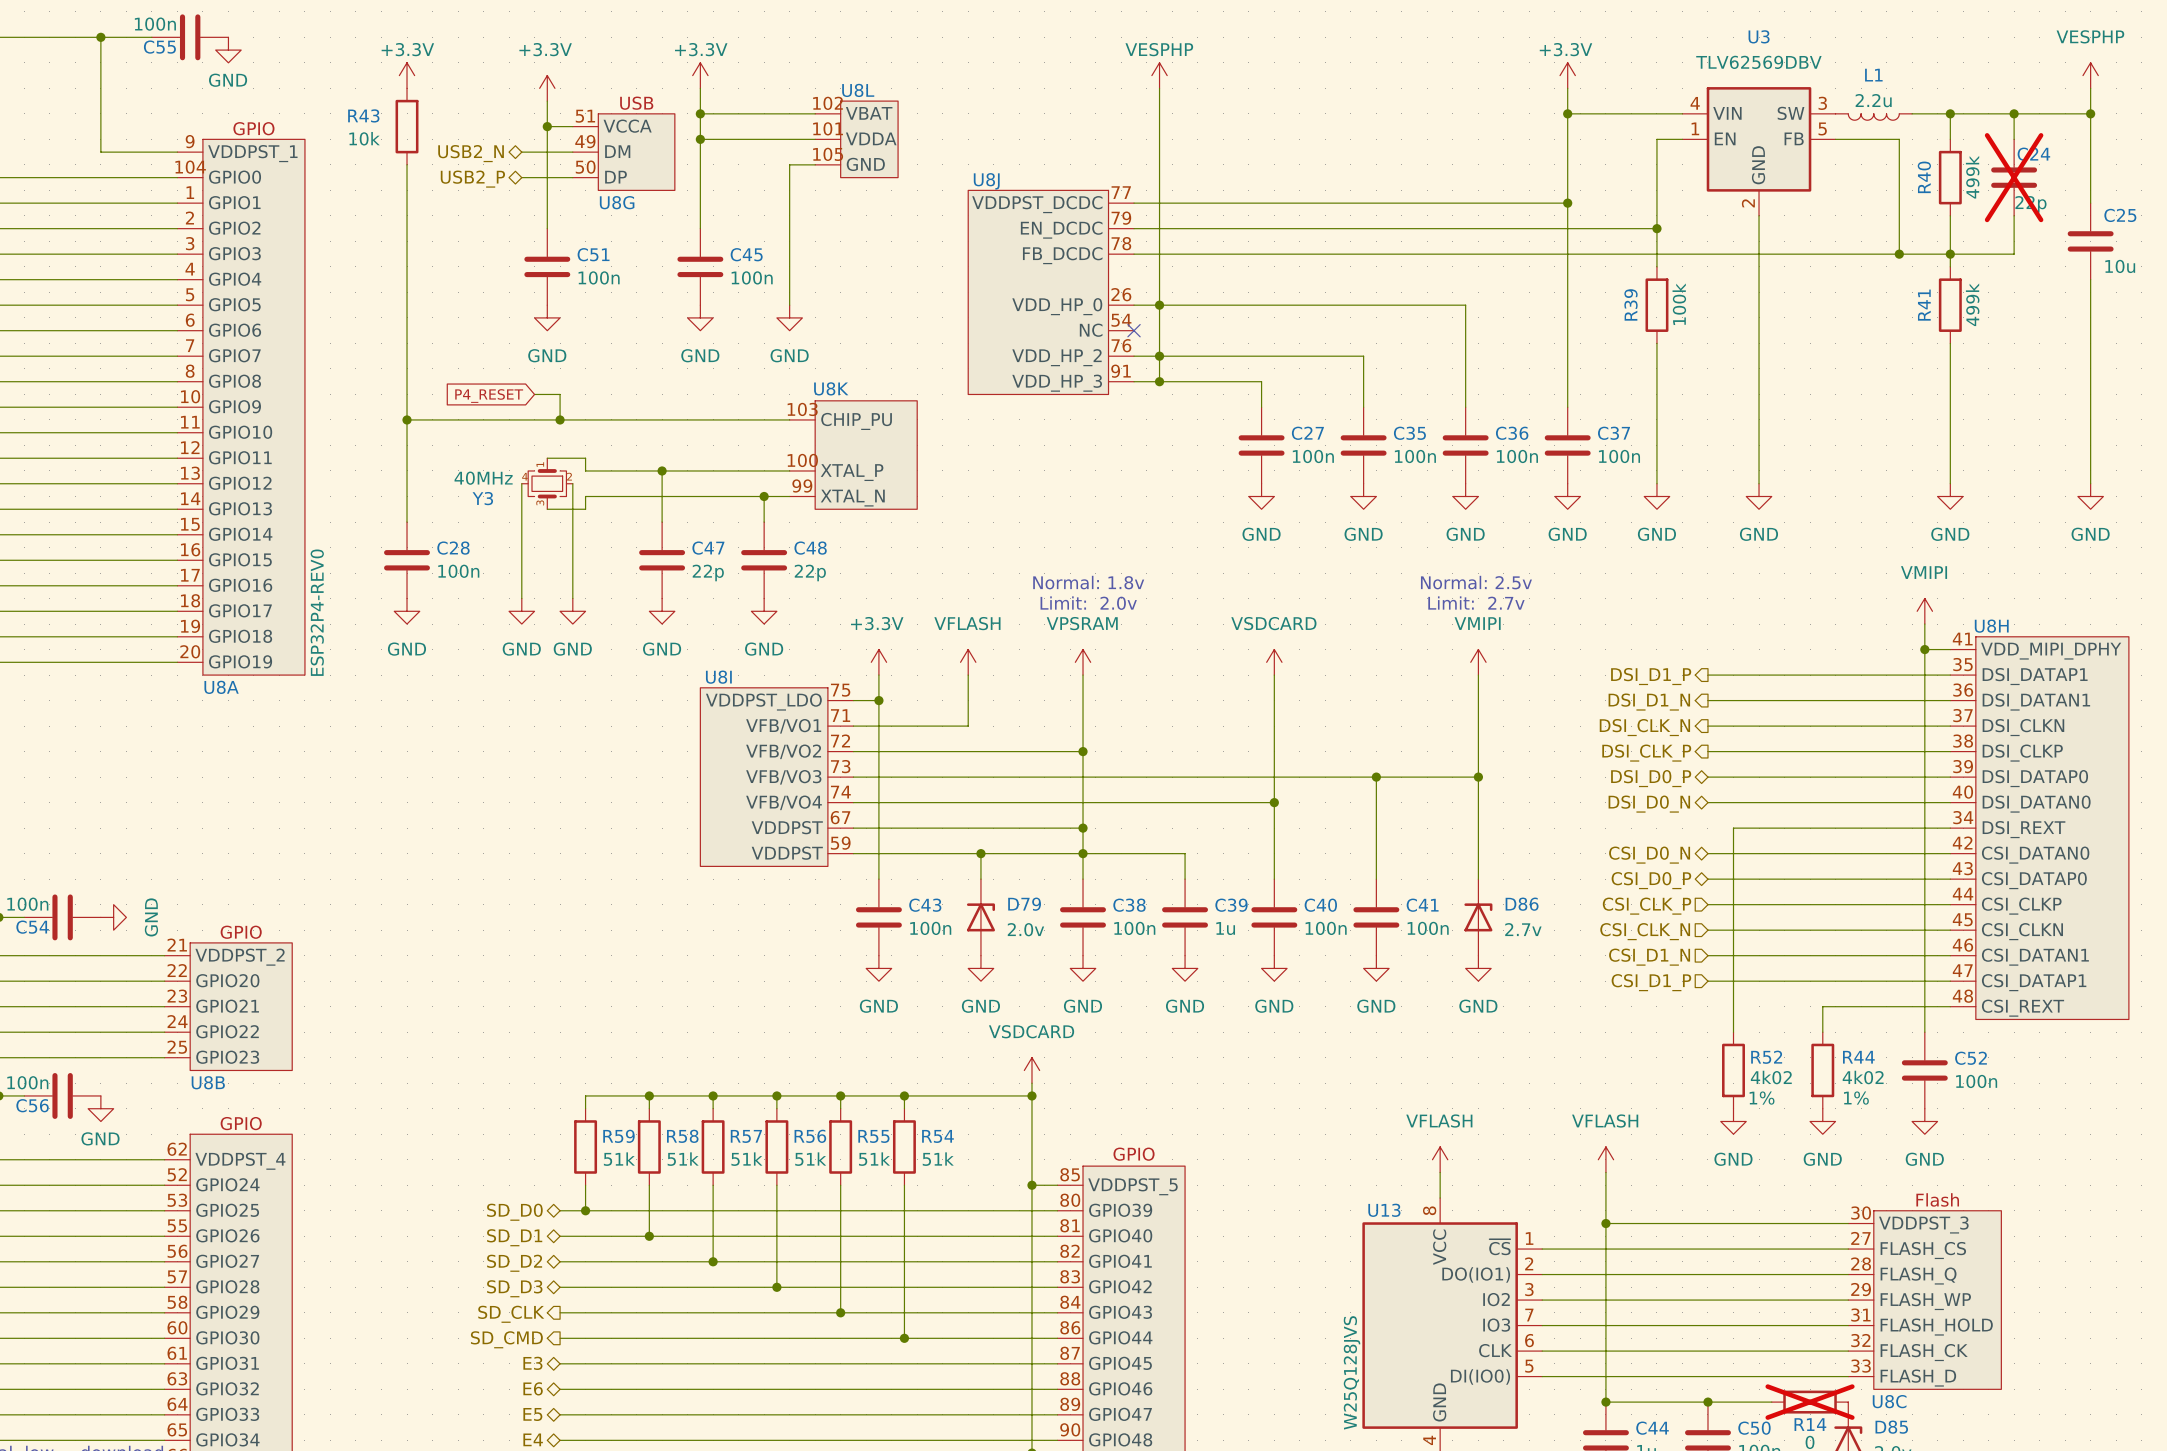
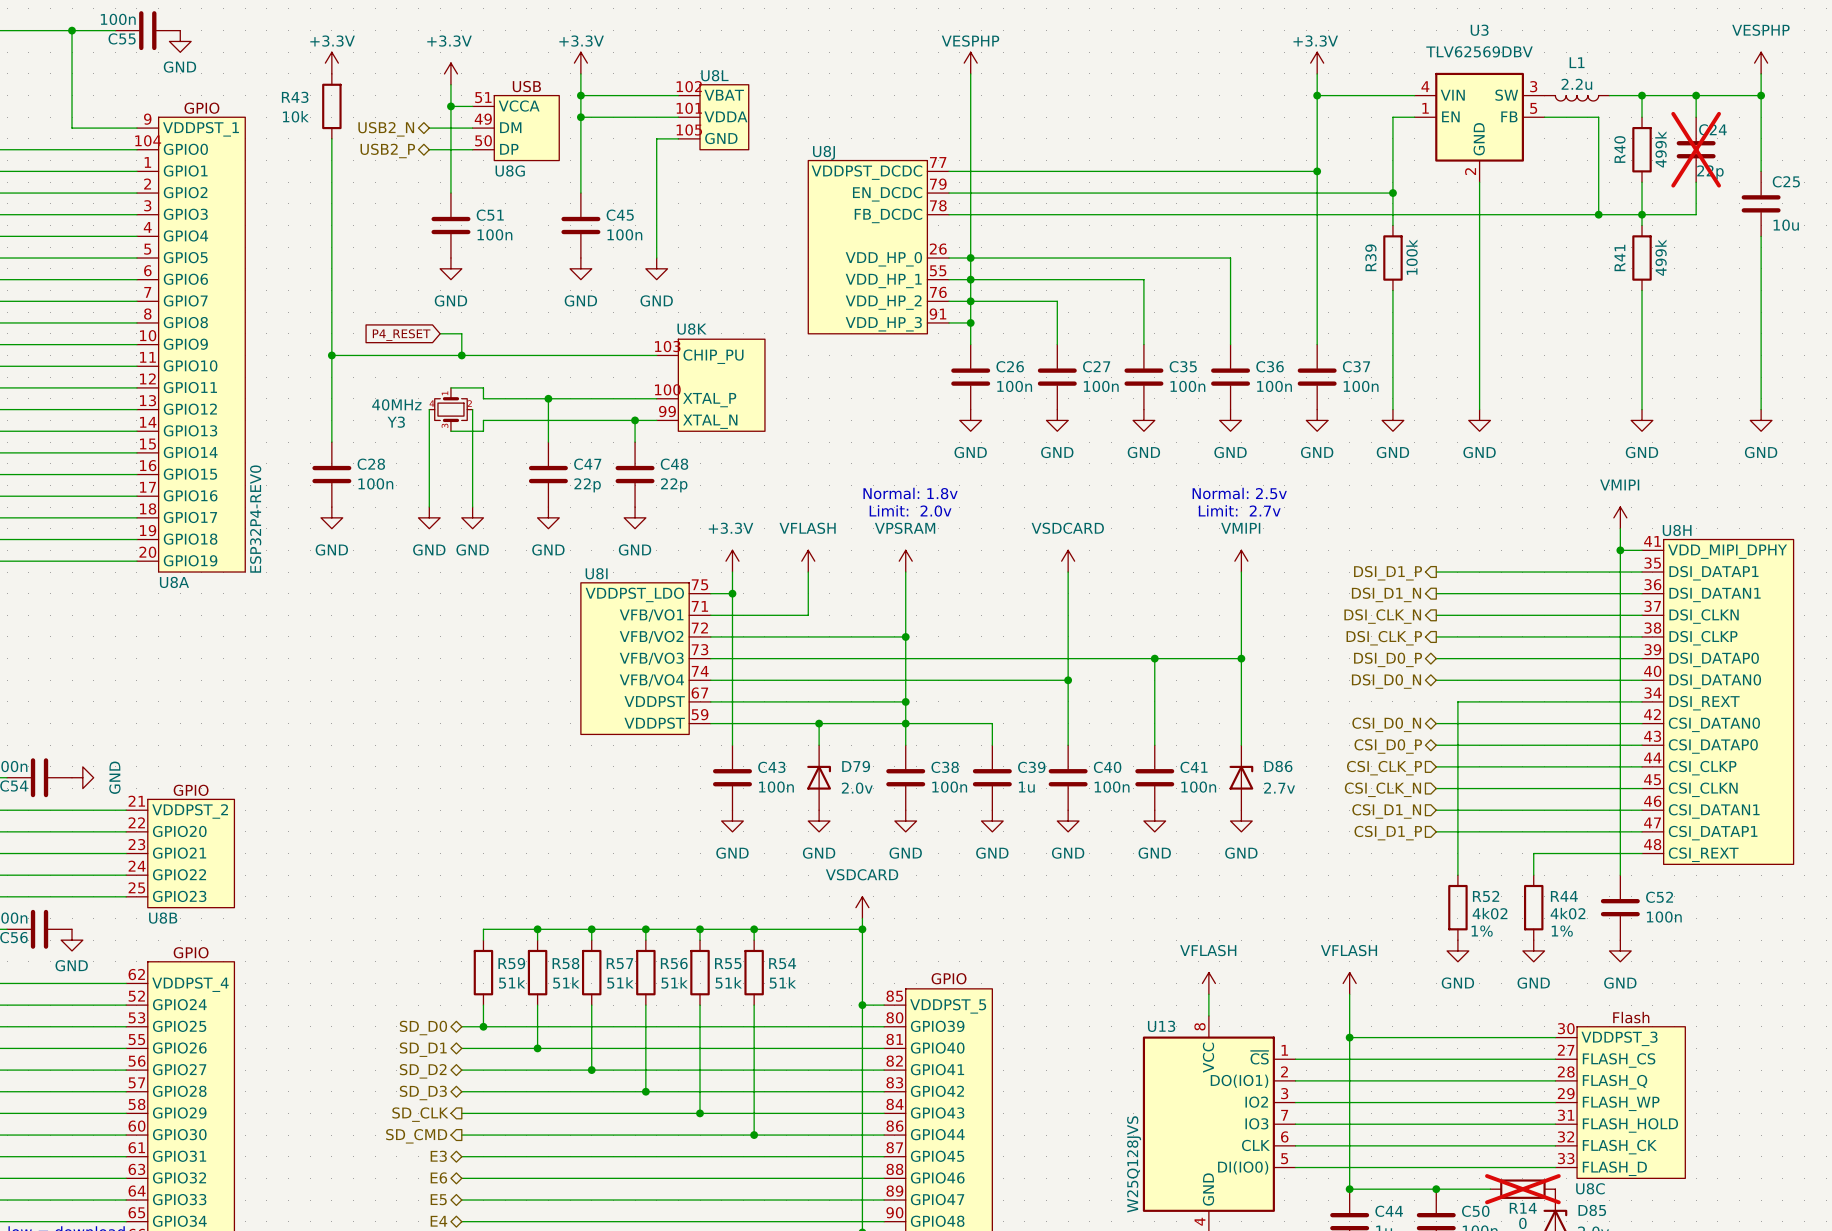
U8J pin number: 54 (1121, 320) -> 55 (938, 270)
U8J pin name: NC (1091, 330) -> VDD_HP_1 (883, 281)
wire: none -> (949, 279) (1143, 279) (1143, 301)
no-connect mark: (1134, 330) -> none
junction: none -> (970, 279)
wire: (1261, 356) (1363, 356) -> (1057, 301) (1057, 322)
wire: (1159, 381) (1261, 381) -> (970, 322) (970, 344)
C26: none -> 100n (970, 377)
power symbol: none -> GND (970, 420)

